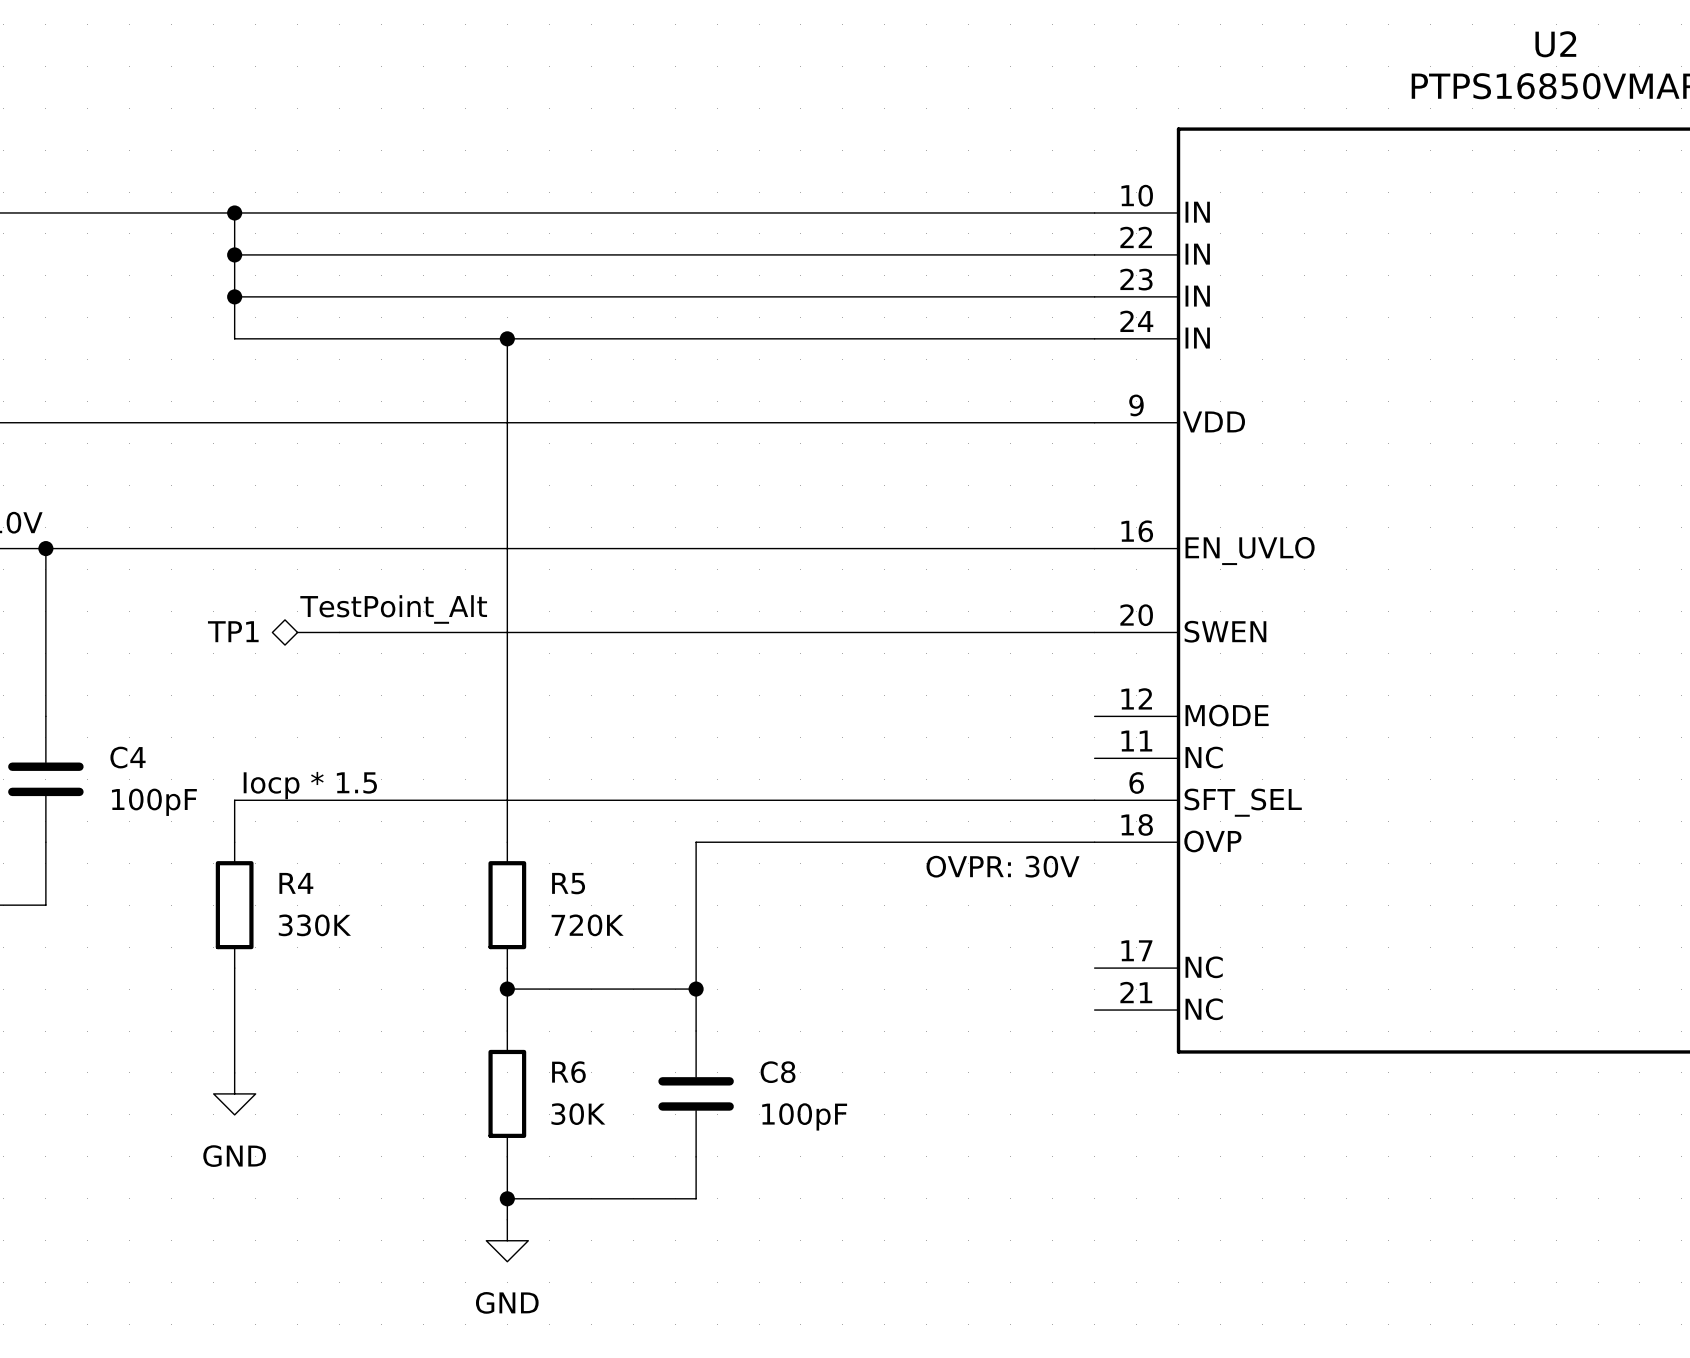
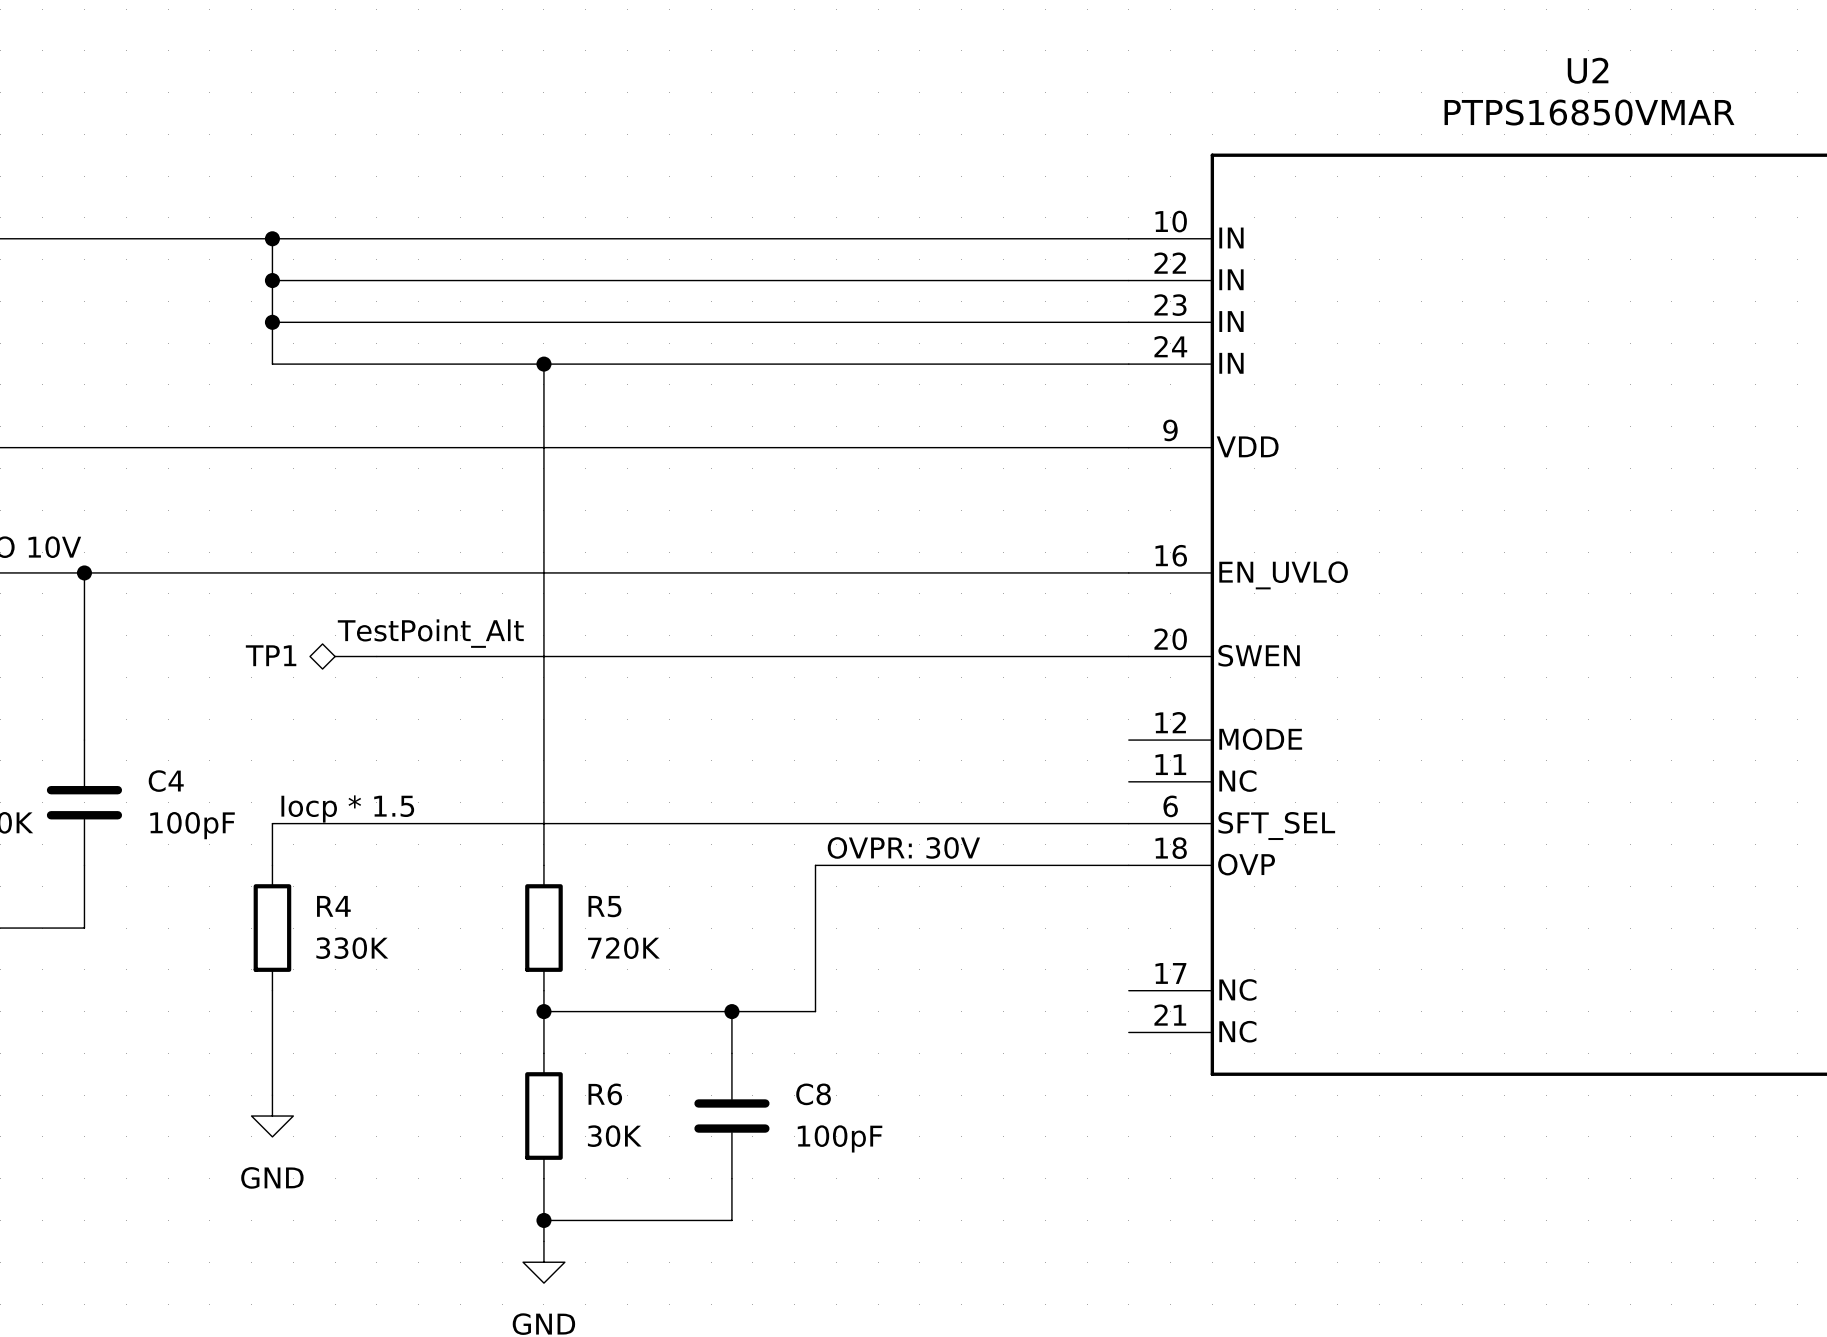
wire: (780, 842) (696, 842) (696, 989) -> (815, 865) (815, 1011) (731, 1011)
text position: OVPR: 30V (1003, 866) -> OVPR: 30V (903, 847)

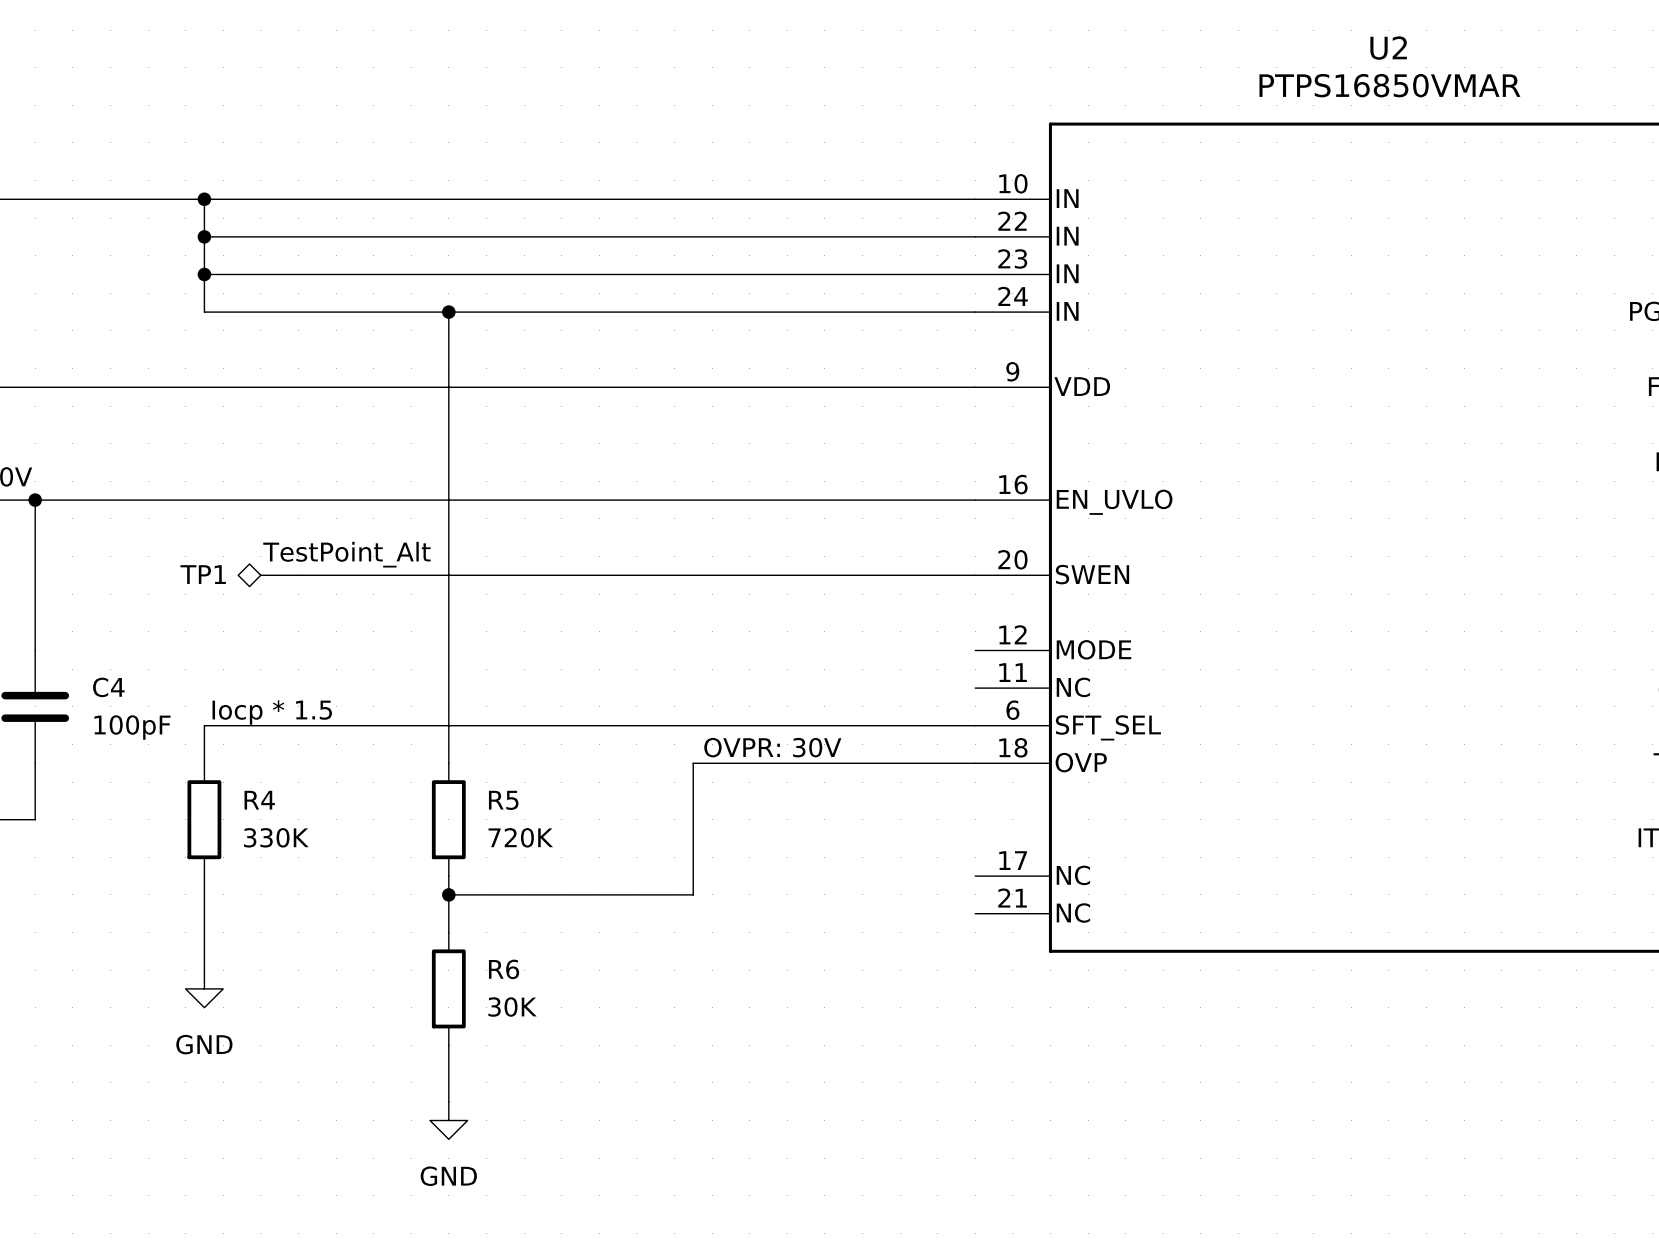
wire: (731, 1011) (731, 1053) -> none
junction: (731, 1011) -> none
C8: 100pF (731, 1116) -> none
wire: (731, 1178) (731, 1220) (543, 1220) -> none
junction: (543, 1220) -> none

